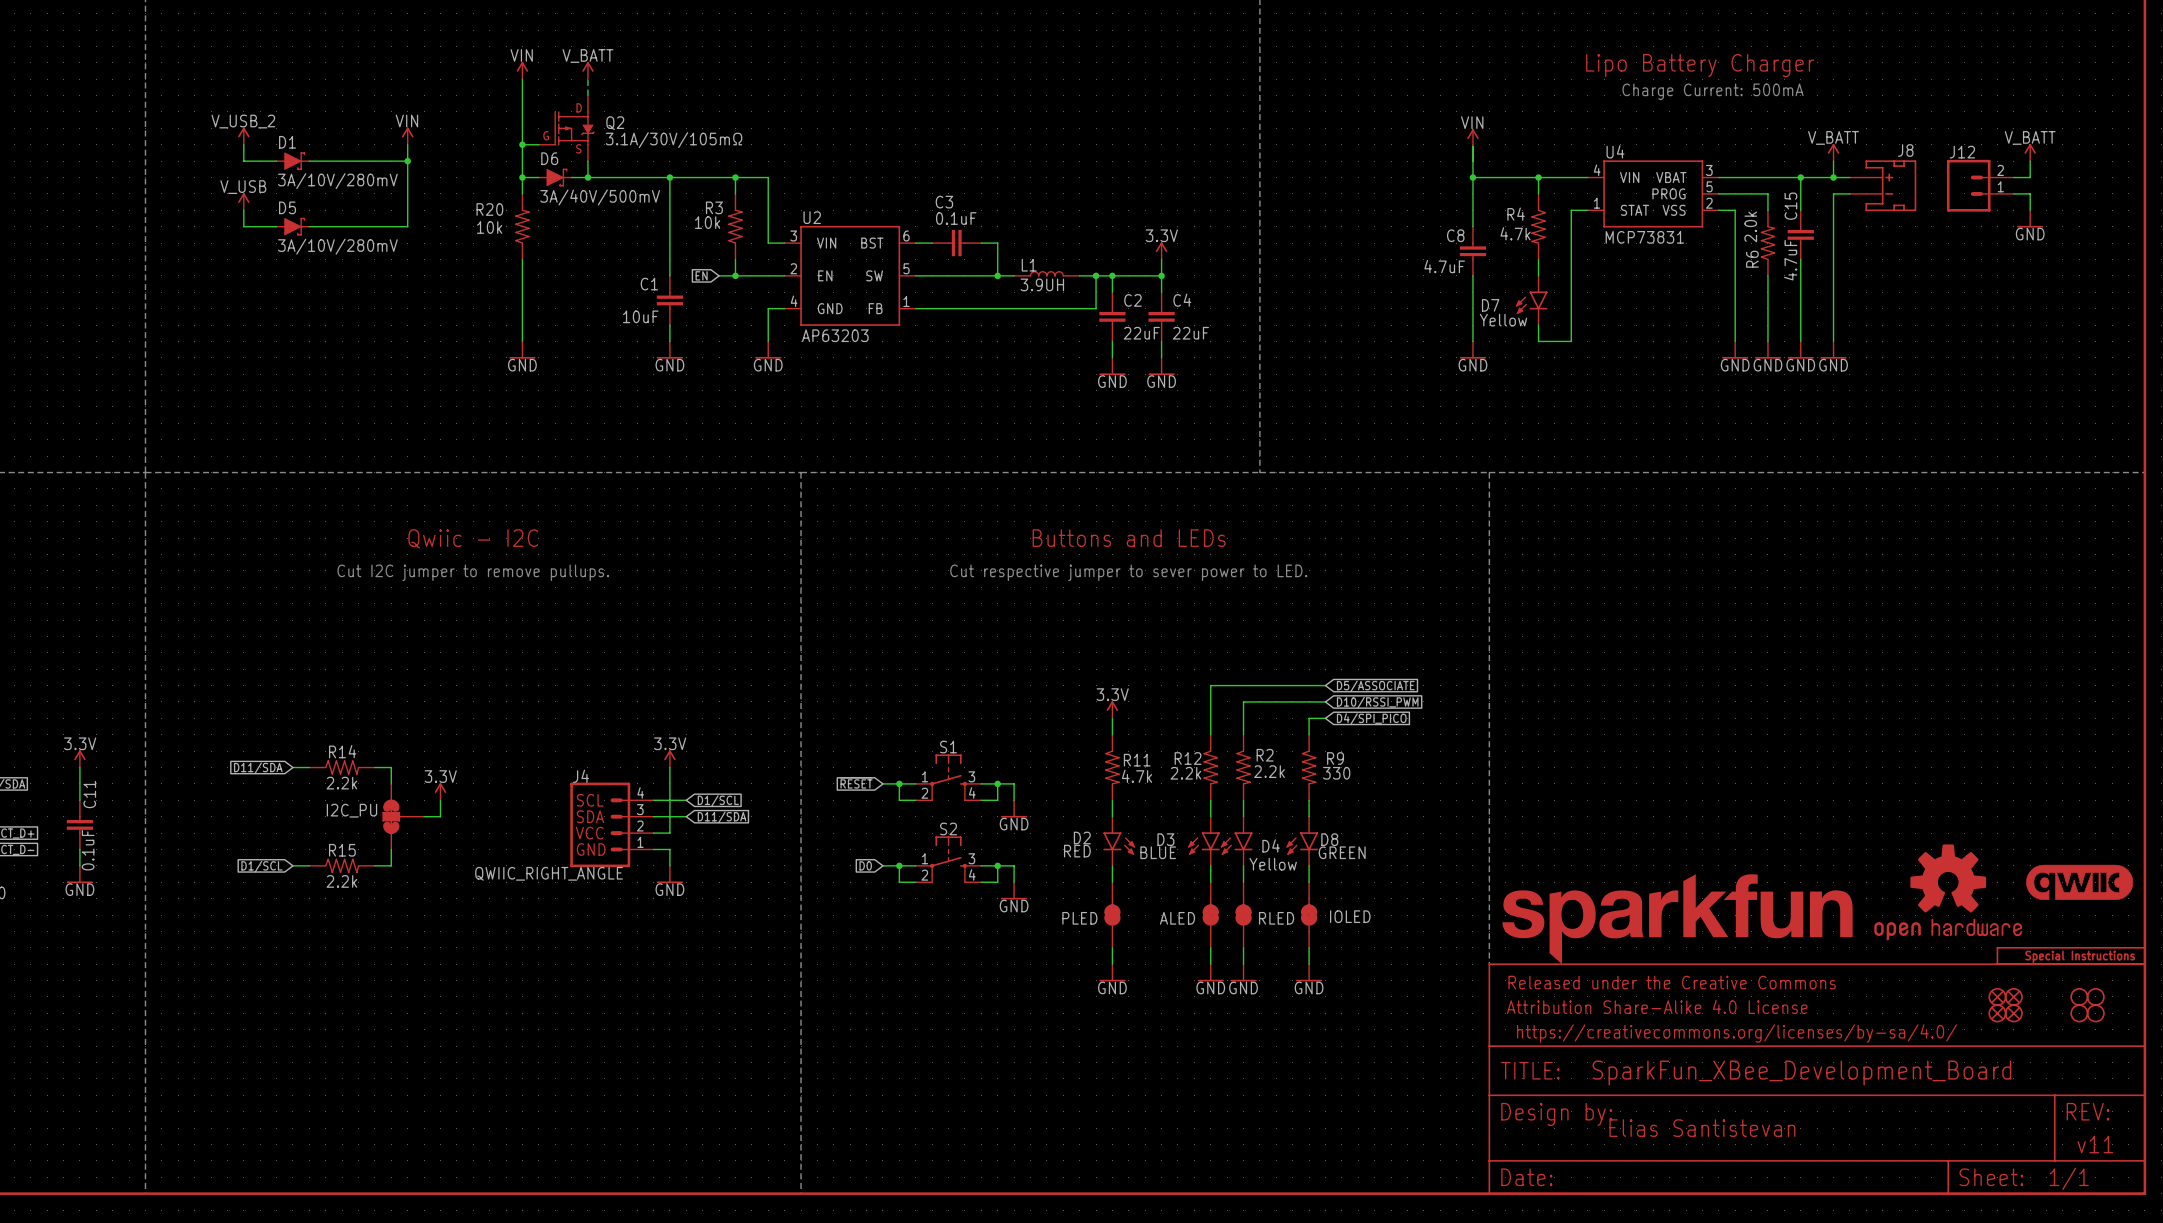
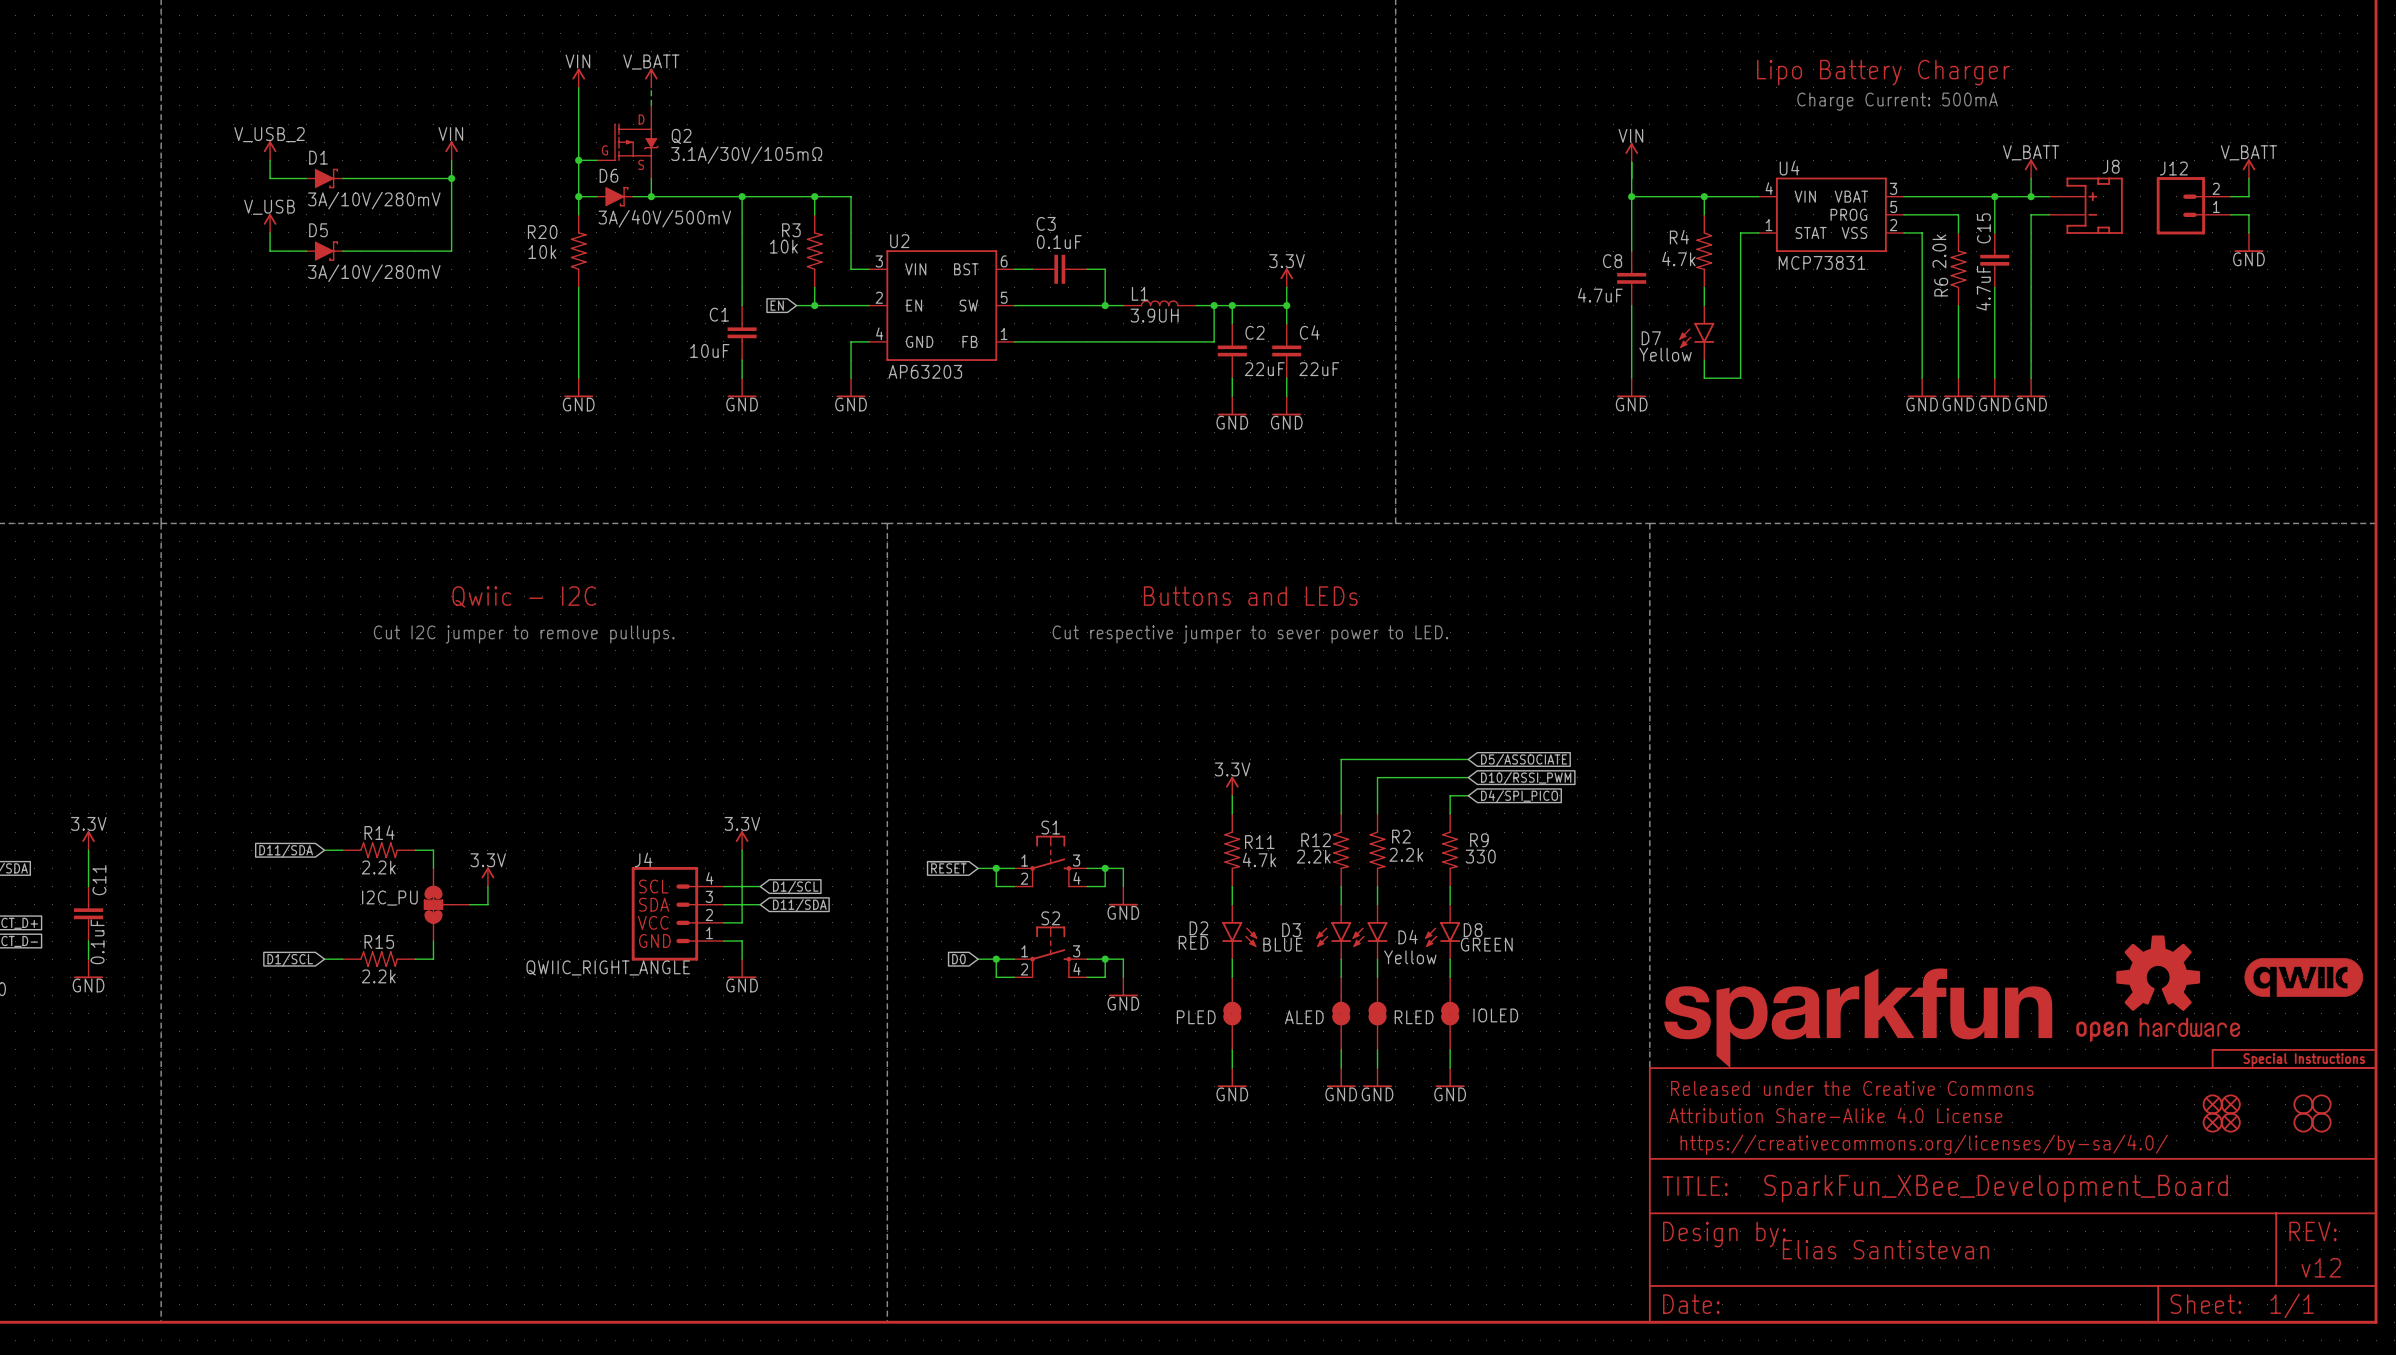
text: v11 (2095, 1144) -> v12 (2321, 1267)

